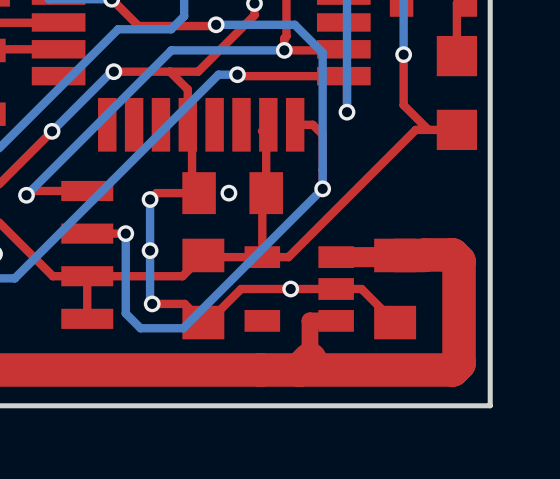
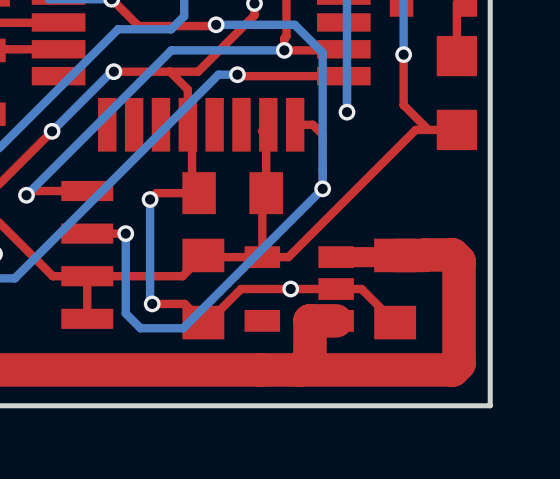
via: (228, 193) -> none
via: (150, 250) -> none
top track width: thin (336, 320) (309, 320) (309, 359) -> thick (336, 320) (309, 320) (309, 359)

